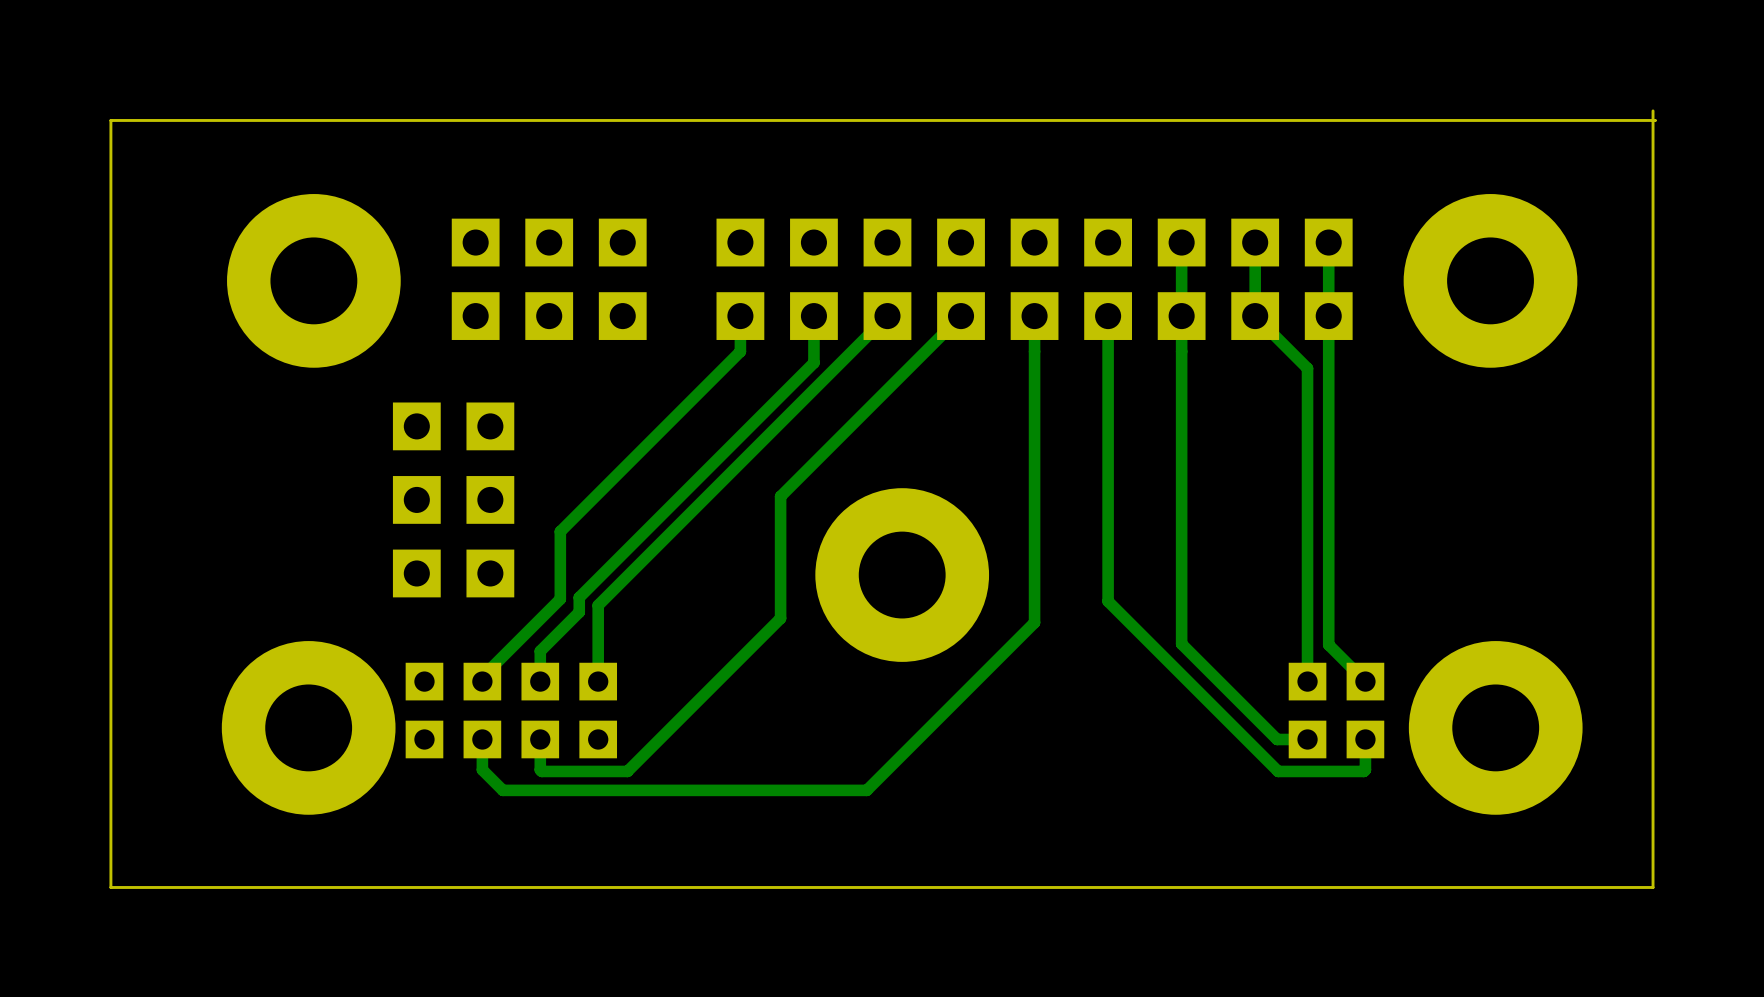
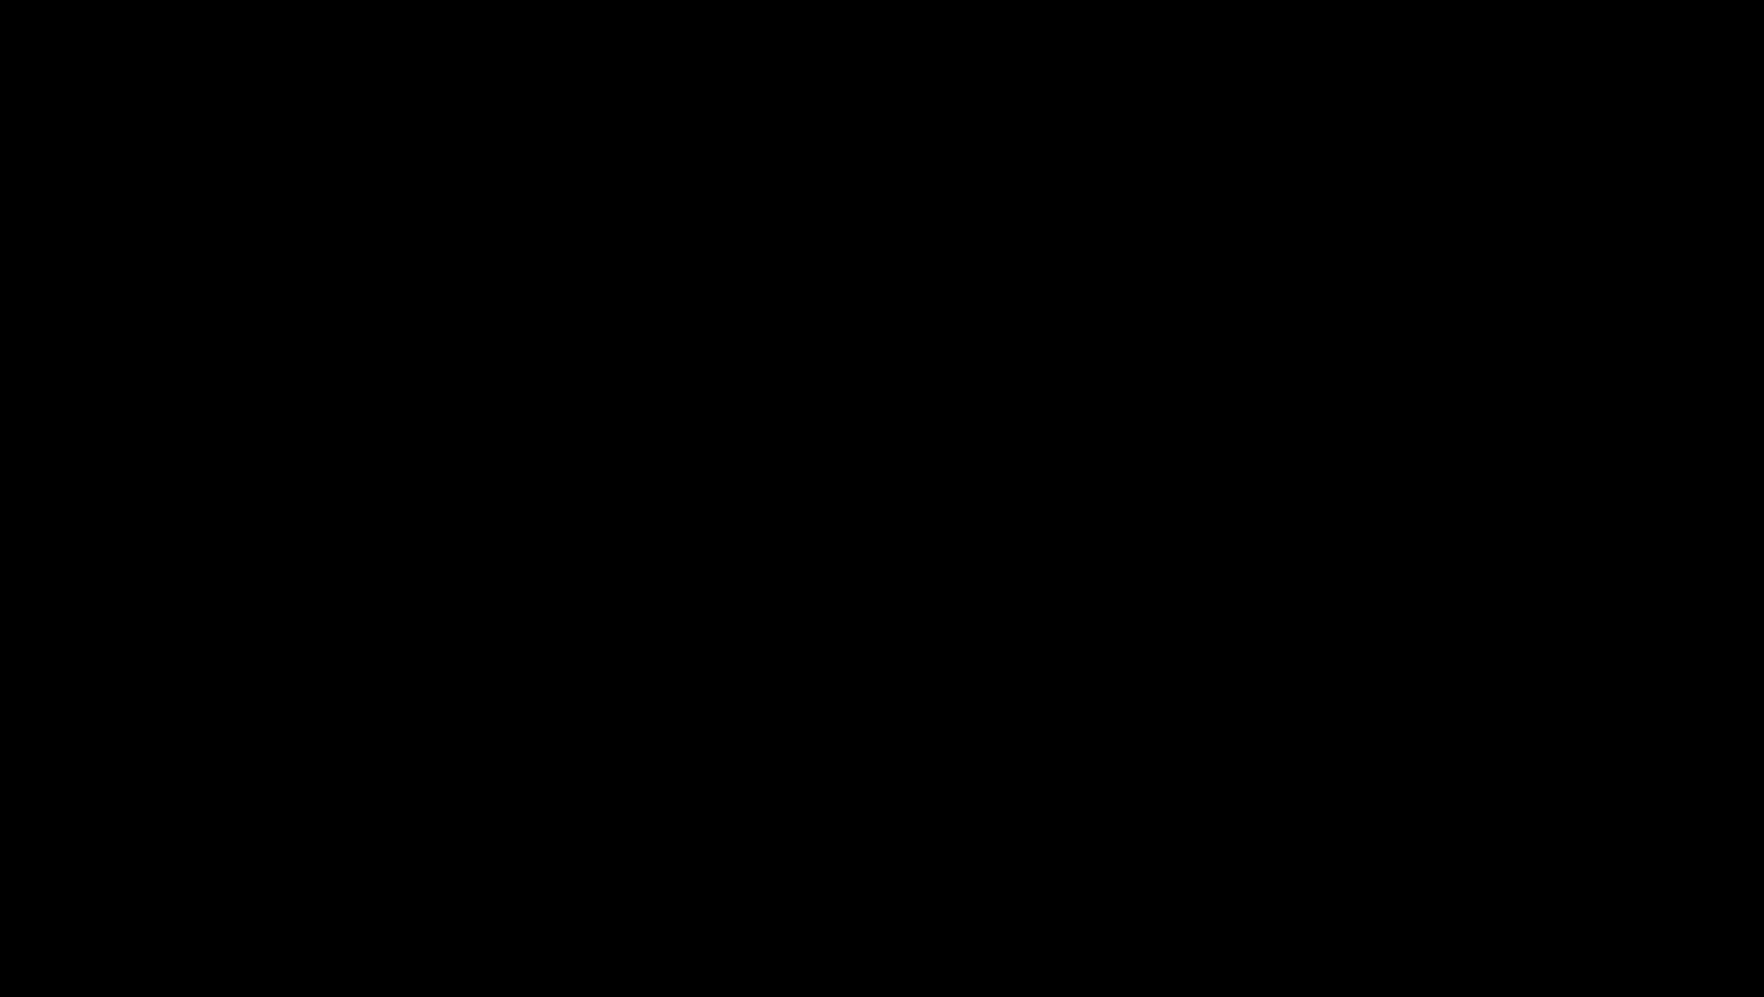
board edge: (1653, 110) (1653, 887) (110, 887) (110, 120) (1655, 120) -> none
track: (1181, 242) (1181, 644) (1277, 739) (1307, 739) -> none
track: (1255, 242) (1255, 316) (1307, 368) (1307, 681) -> none
track: (1328, 242) (1328, 644) (1365, 681) -> none
part: (549, 279) -> none
part: (740, 279) -> none
part: (813, 279) -> none
part: (887, 279) -> none
part: (961, 279) -> none
part: (1034, 279) -> none
part: (1108, 279) -> none
part: (1181, 279) -> none
part: (1255, 279) -> none
part: (1328, 279) -> none
part: (313, 280) -> none
part: (1490, 280) -> none
track: (740, 316) (740, 351) (560, 531) (560, 599) (482, 677) (482, 681) -> none
track: (813, 316) (813, 362) (579, 597) (579, 612) (540, 651) (540, 681) -> none
track: (887, 316) (598, 605) (598, 681) -> none
track: (961, 316) (780, 496) (780, 618) (627, 771) (541, 771) (540, 739) -> none
track: (1034, 316) (1034, 622) (866, 790) (502, 790) (482, 769) (482, 739) -> none
track: (1108, 316) (1108, 601) (1278, 771) (1363, 771) (1365, 739) -> none
part: (453, 499) -> none
part: (902, 575) -> none
part: (511, 710) -> none
part: (1336, 710) -> none
part: (308, 727) -> none
part: (1495, 727) -> none

